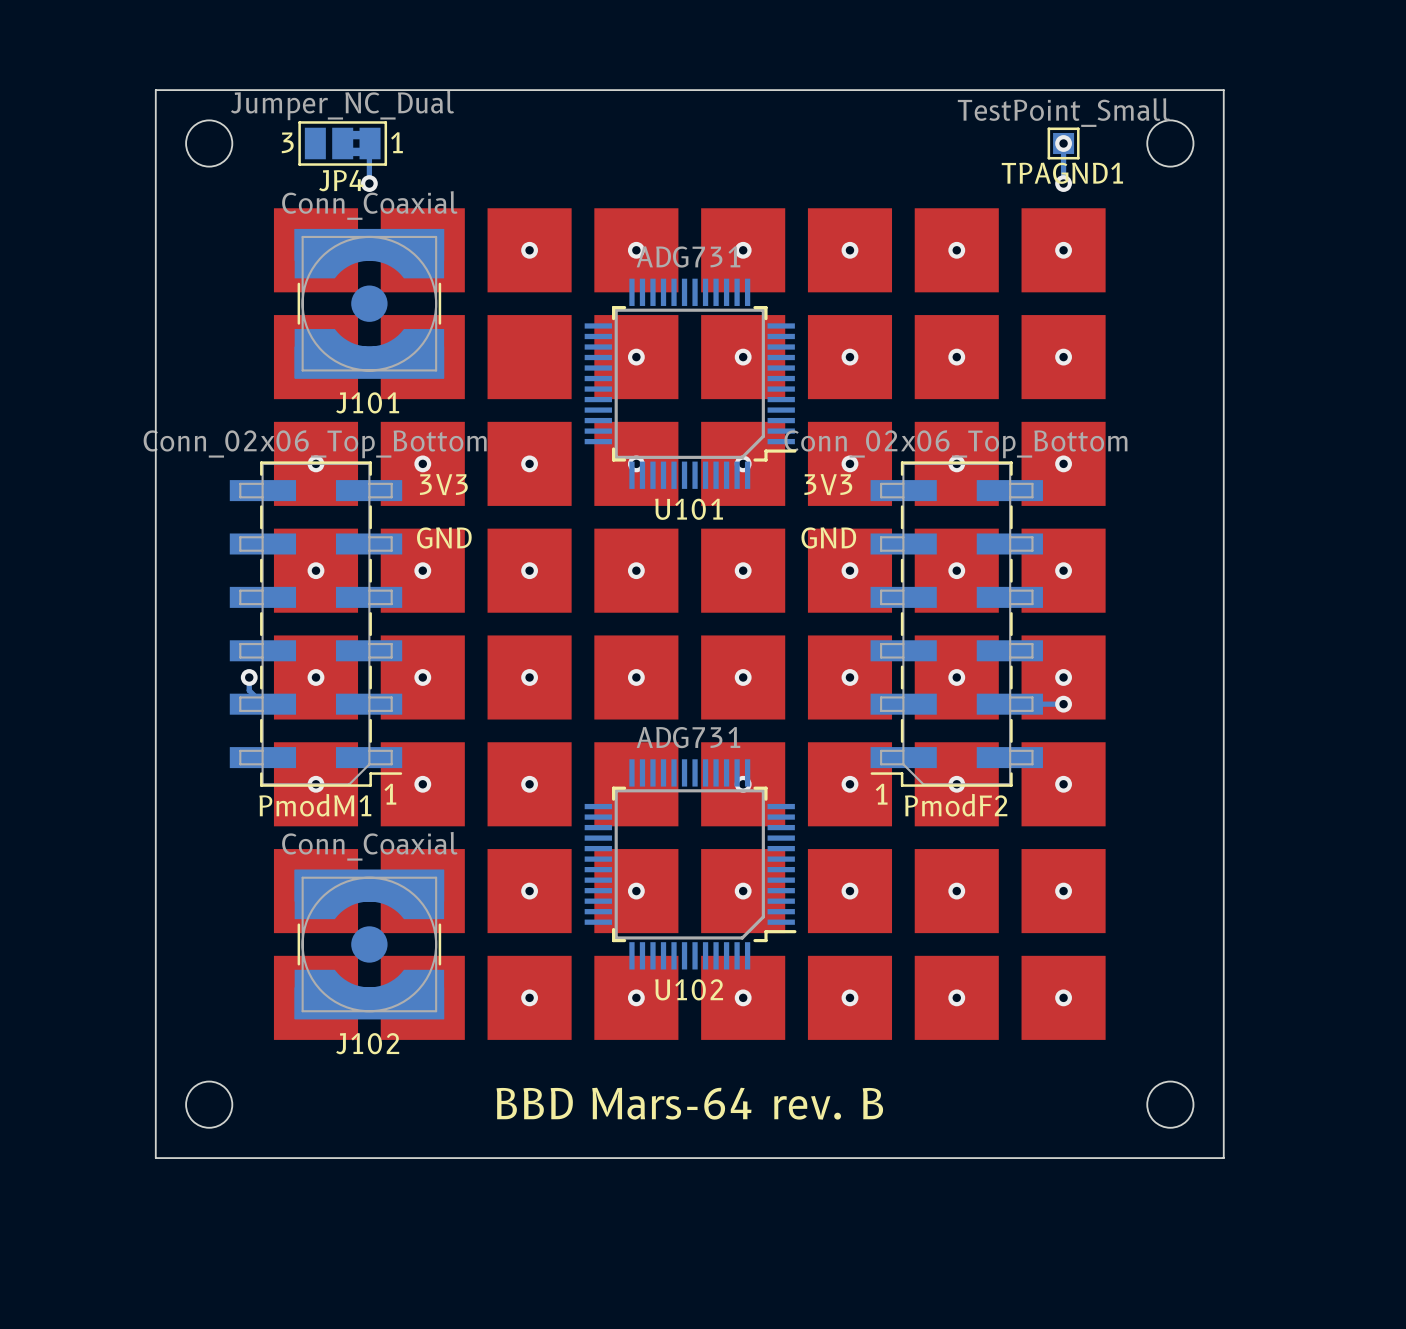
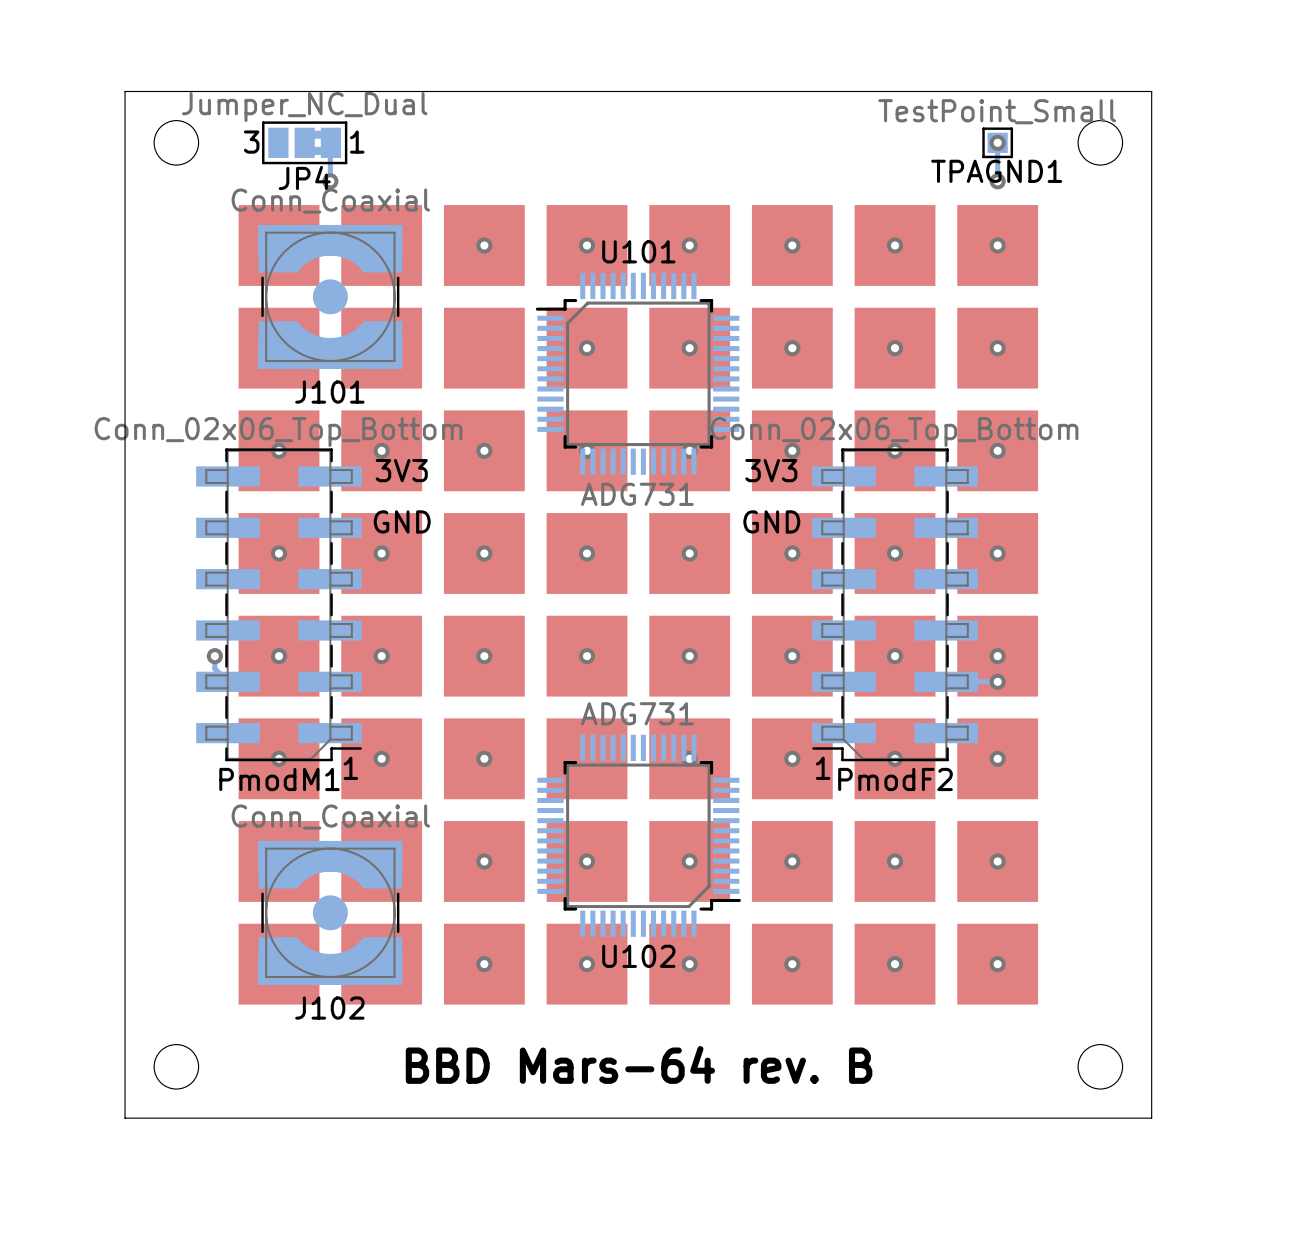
U101 rotation: 0° (690, 383) -> 180° (637, 373)

